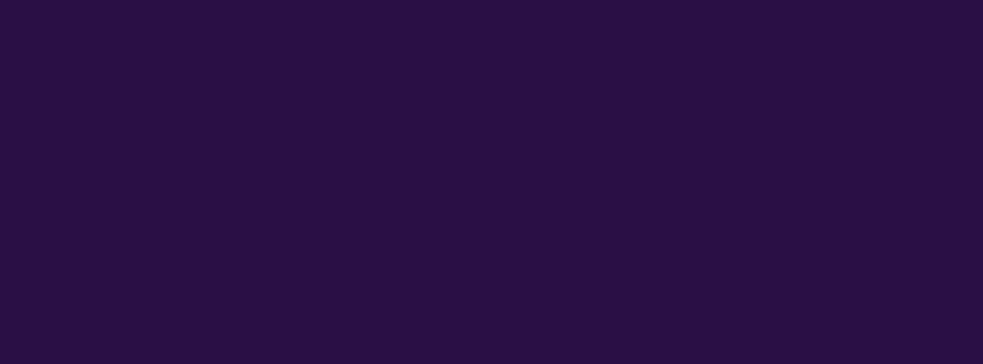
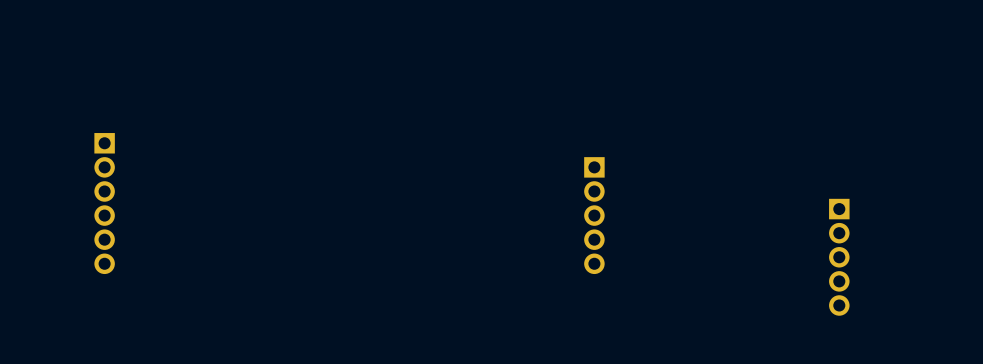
part: none -> (104, 203)
part: none -> (594, 215)
part: none -> (839, 257)

